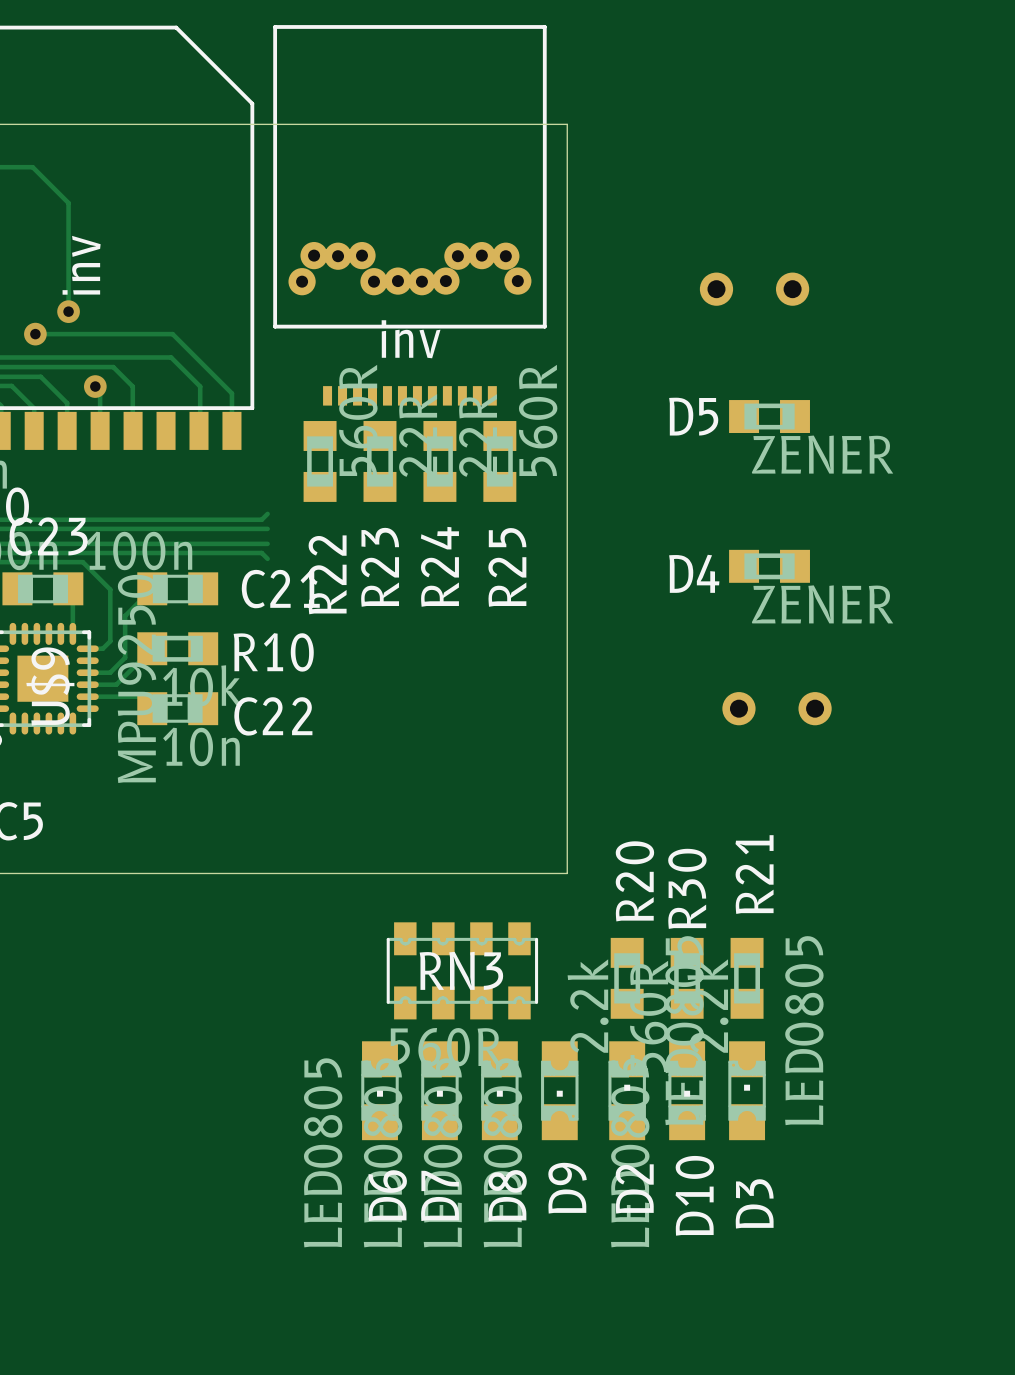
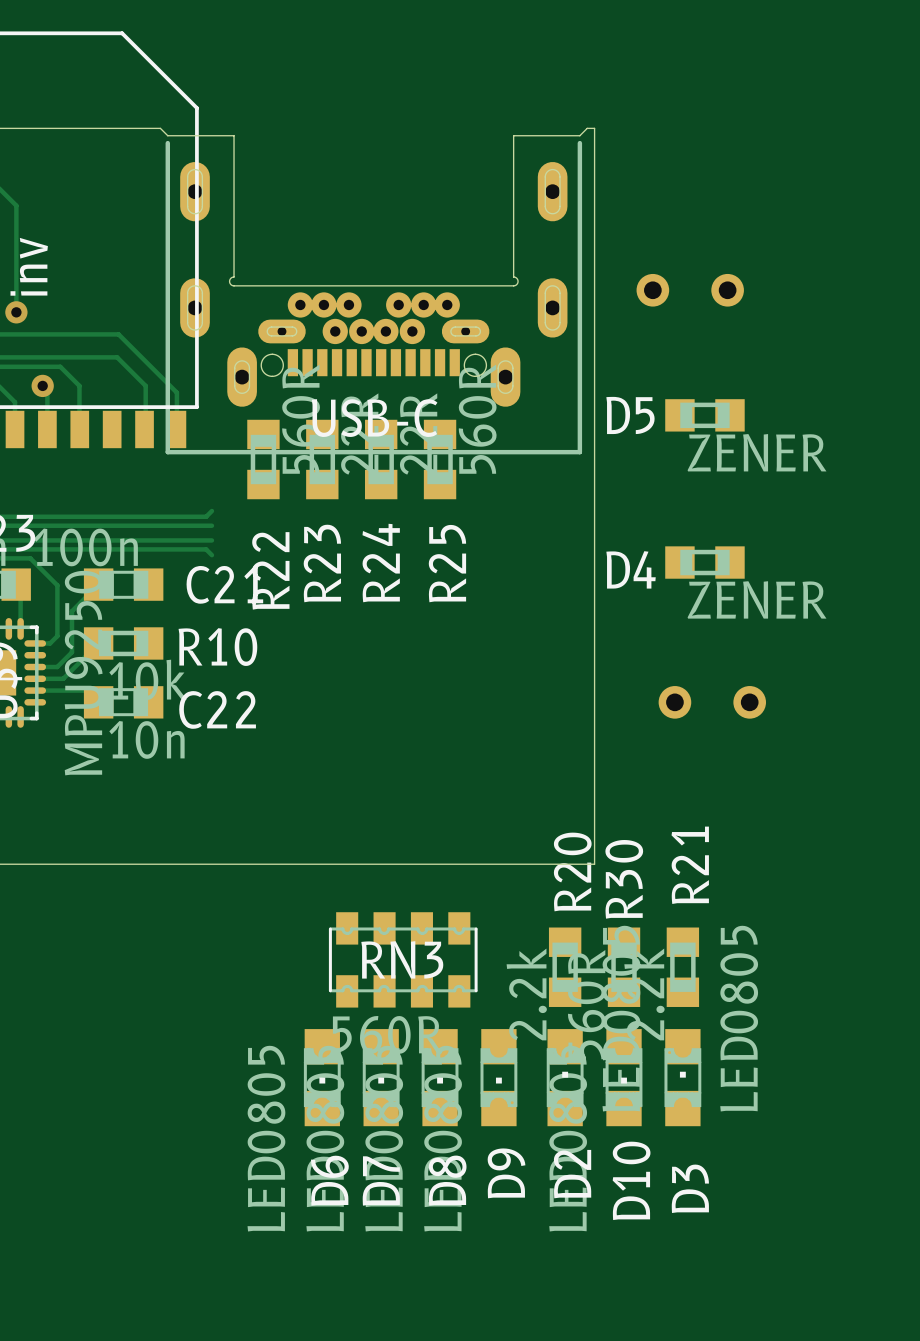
board edge: (215, 124) (567, 124) (567, 873) -> (579, 135) (587, 128) (594, 128) (594, 864) (506, 864)
board edge: none -> (160, 128) (167, 135)
part: (409, 215) -> none
part: none -> (373, 295)

